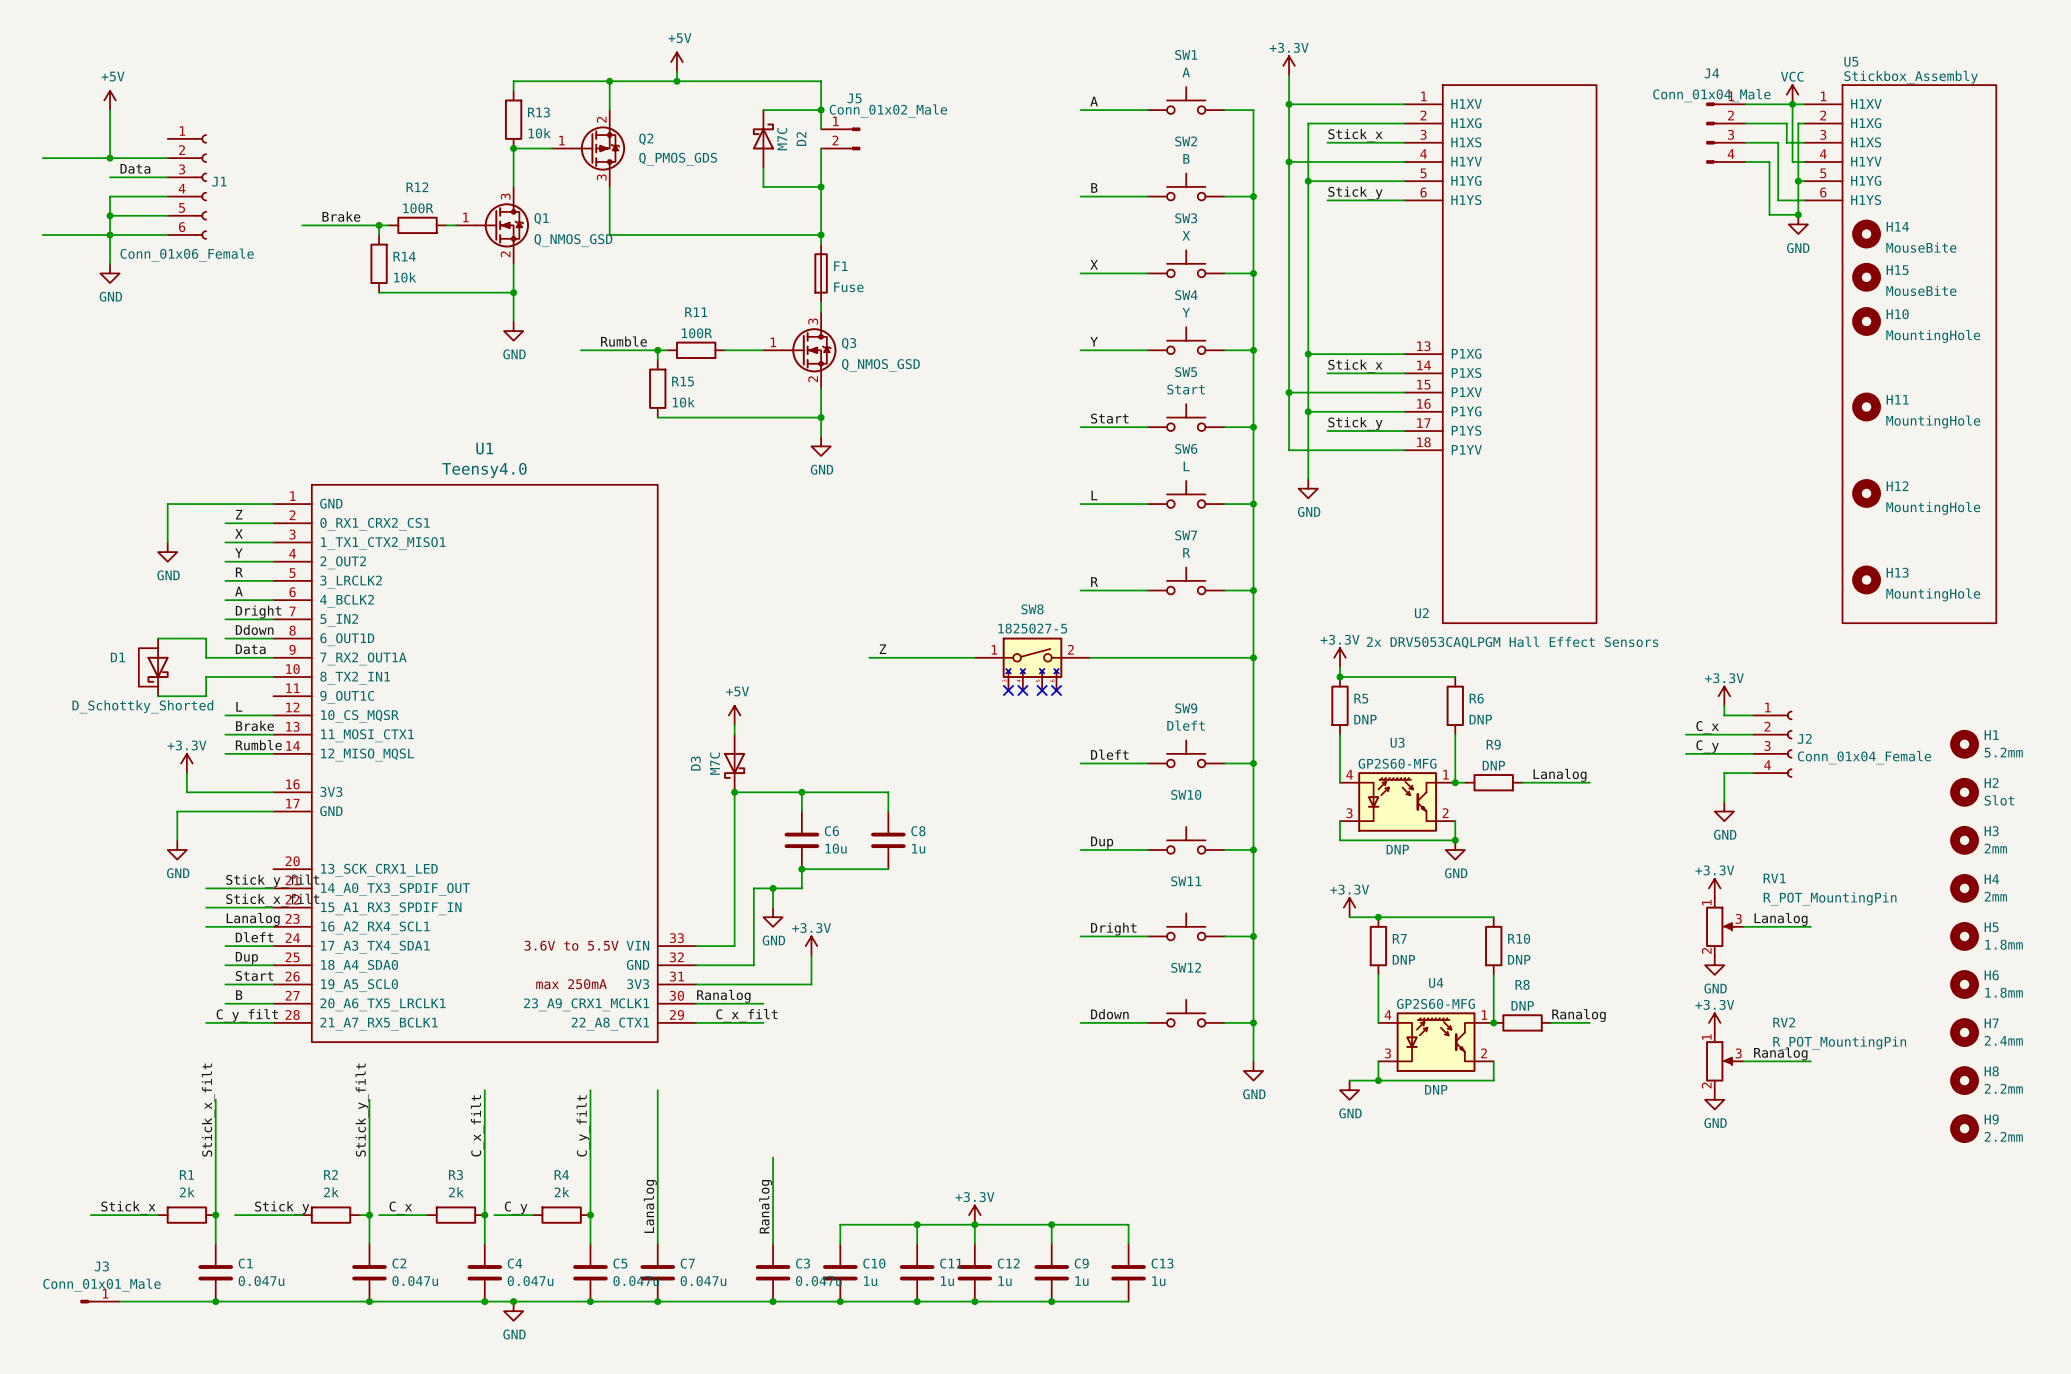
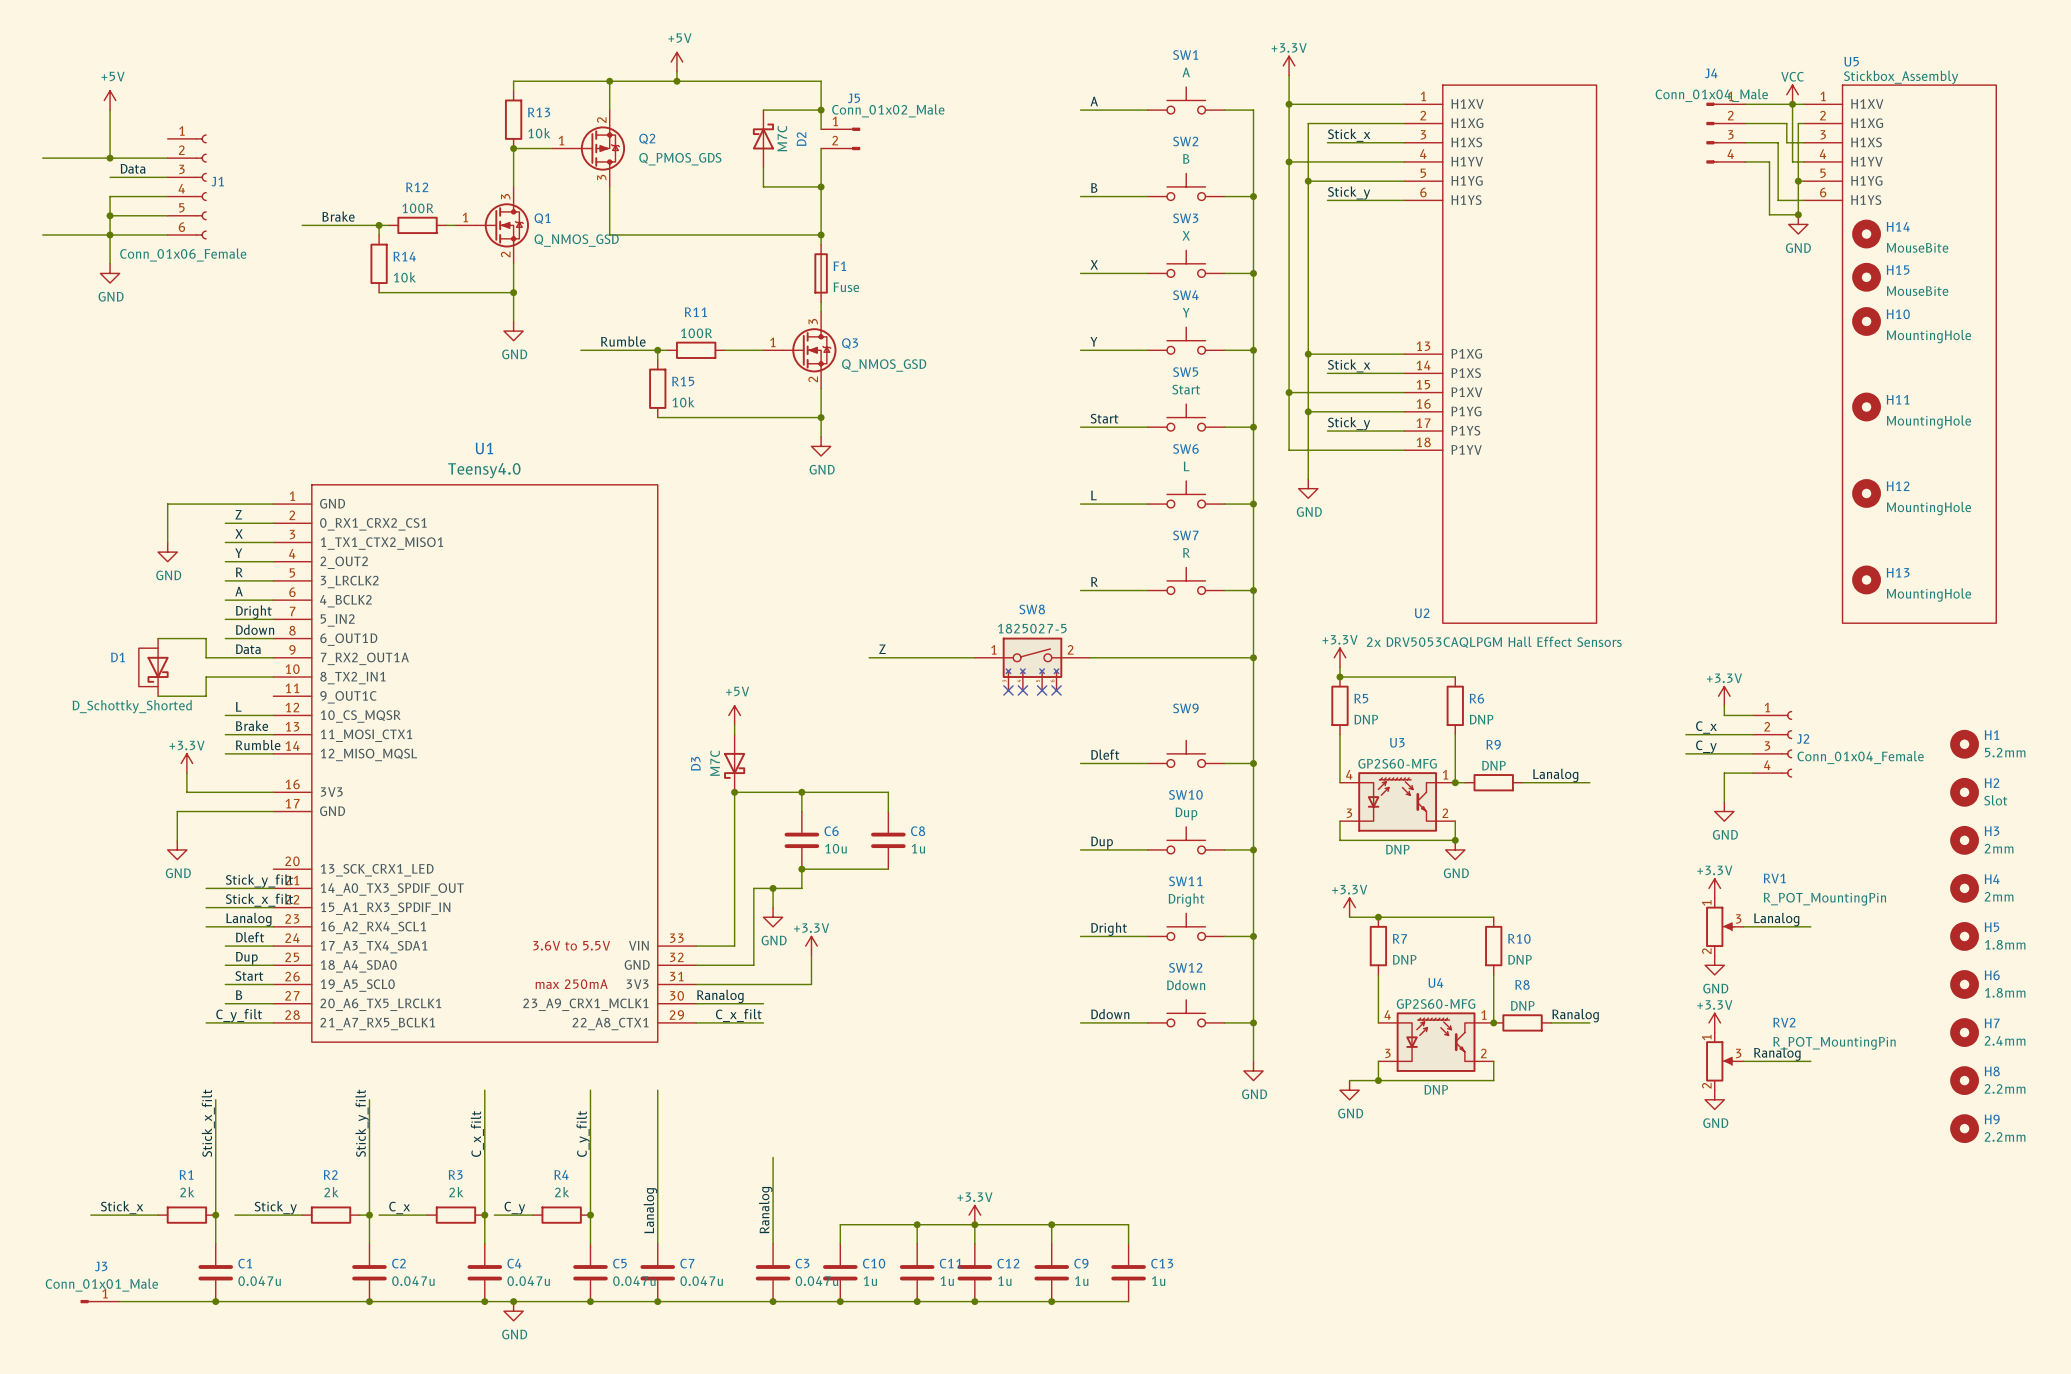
SW9 value: Dleft (1186, 725) -> none
SW10 value: none -> Dup (1186, 813)
SW11 value: none -> Dright (1186, 900)
SW12 value: none -> Ddown (1186, 985)

